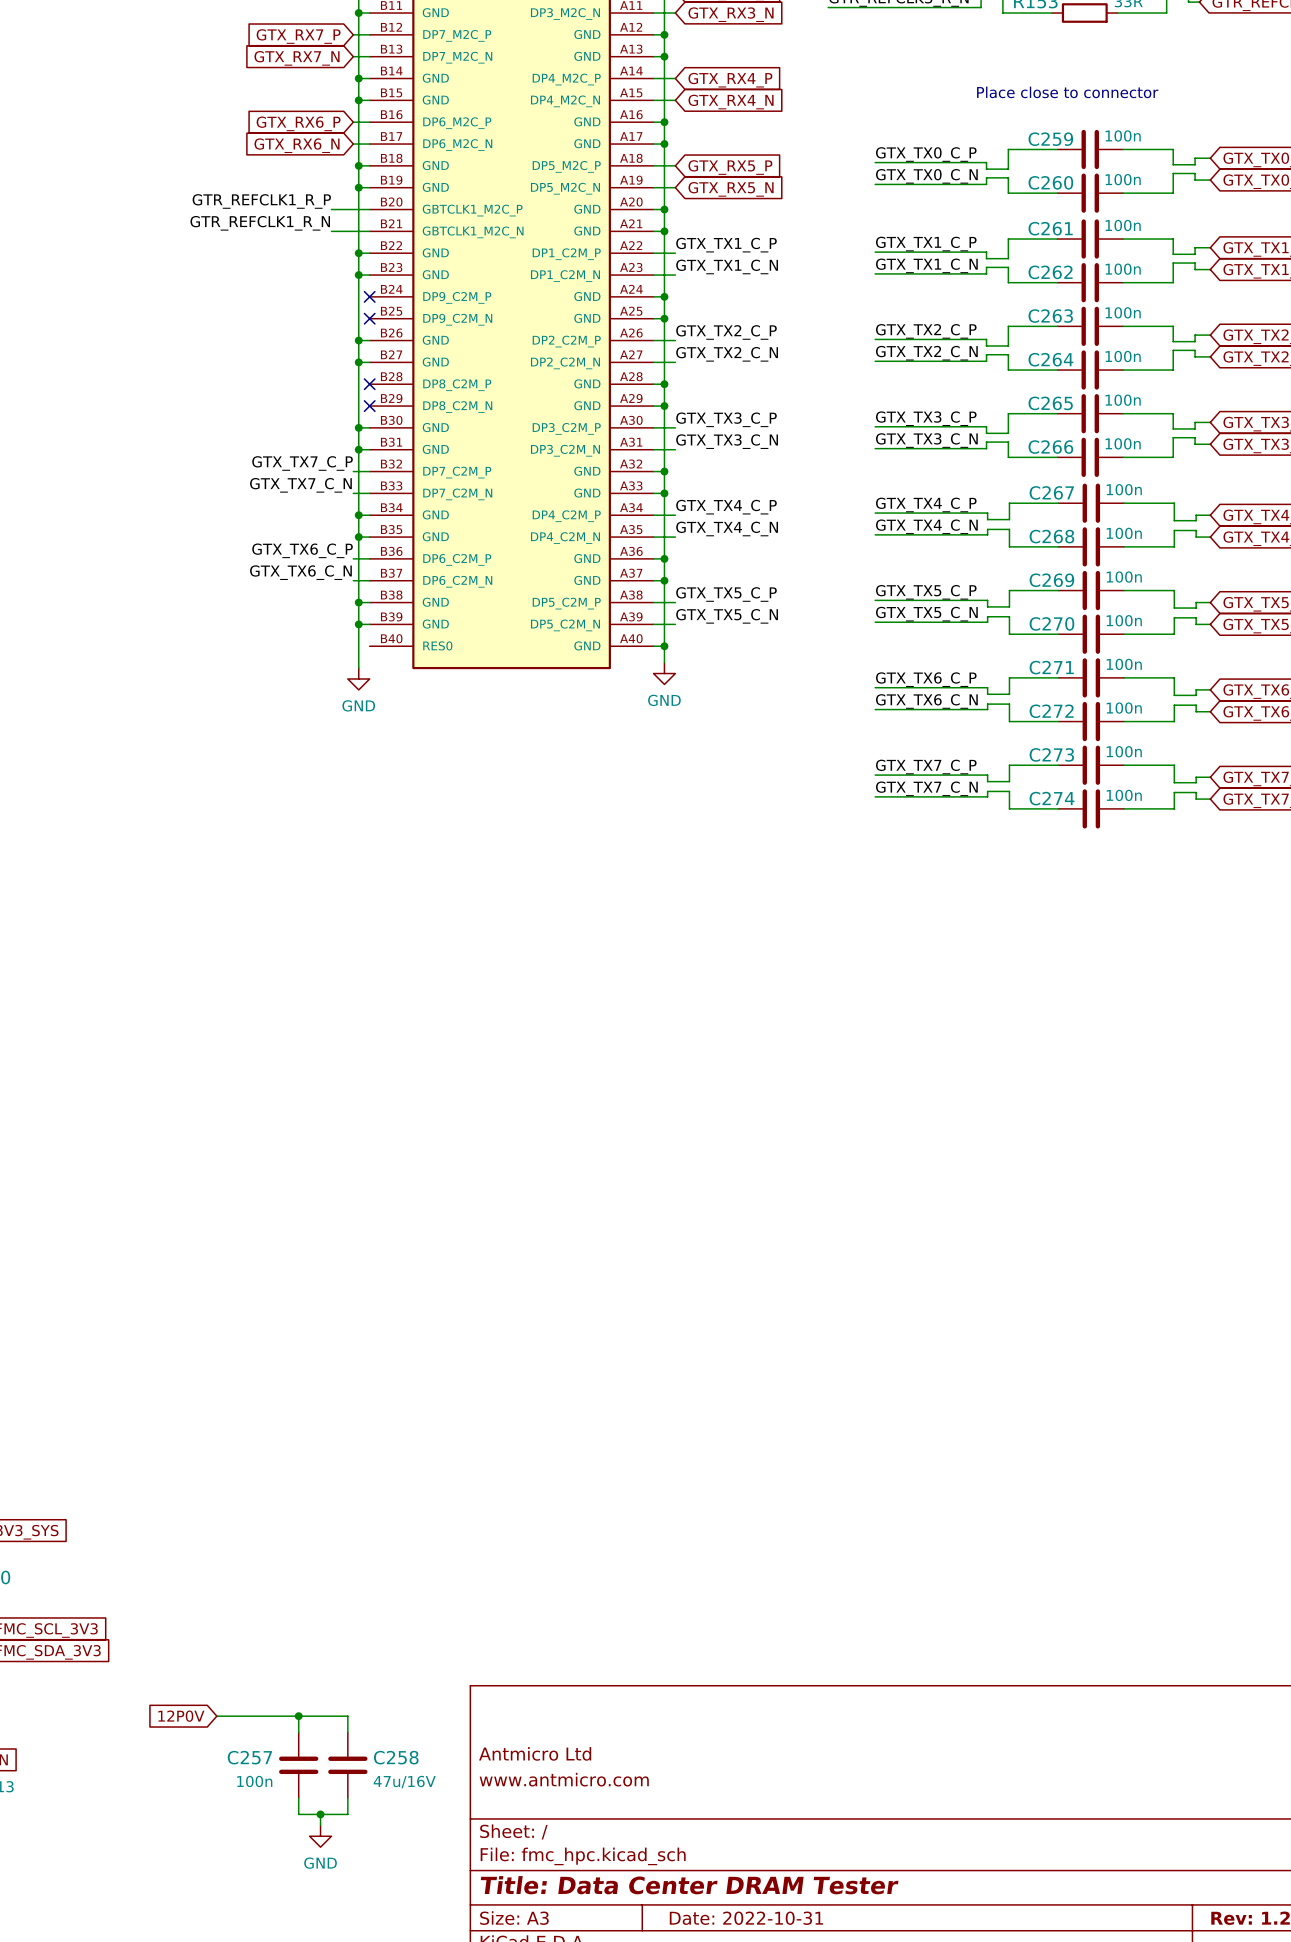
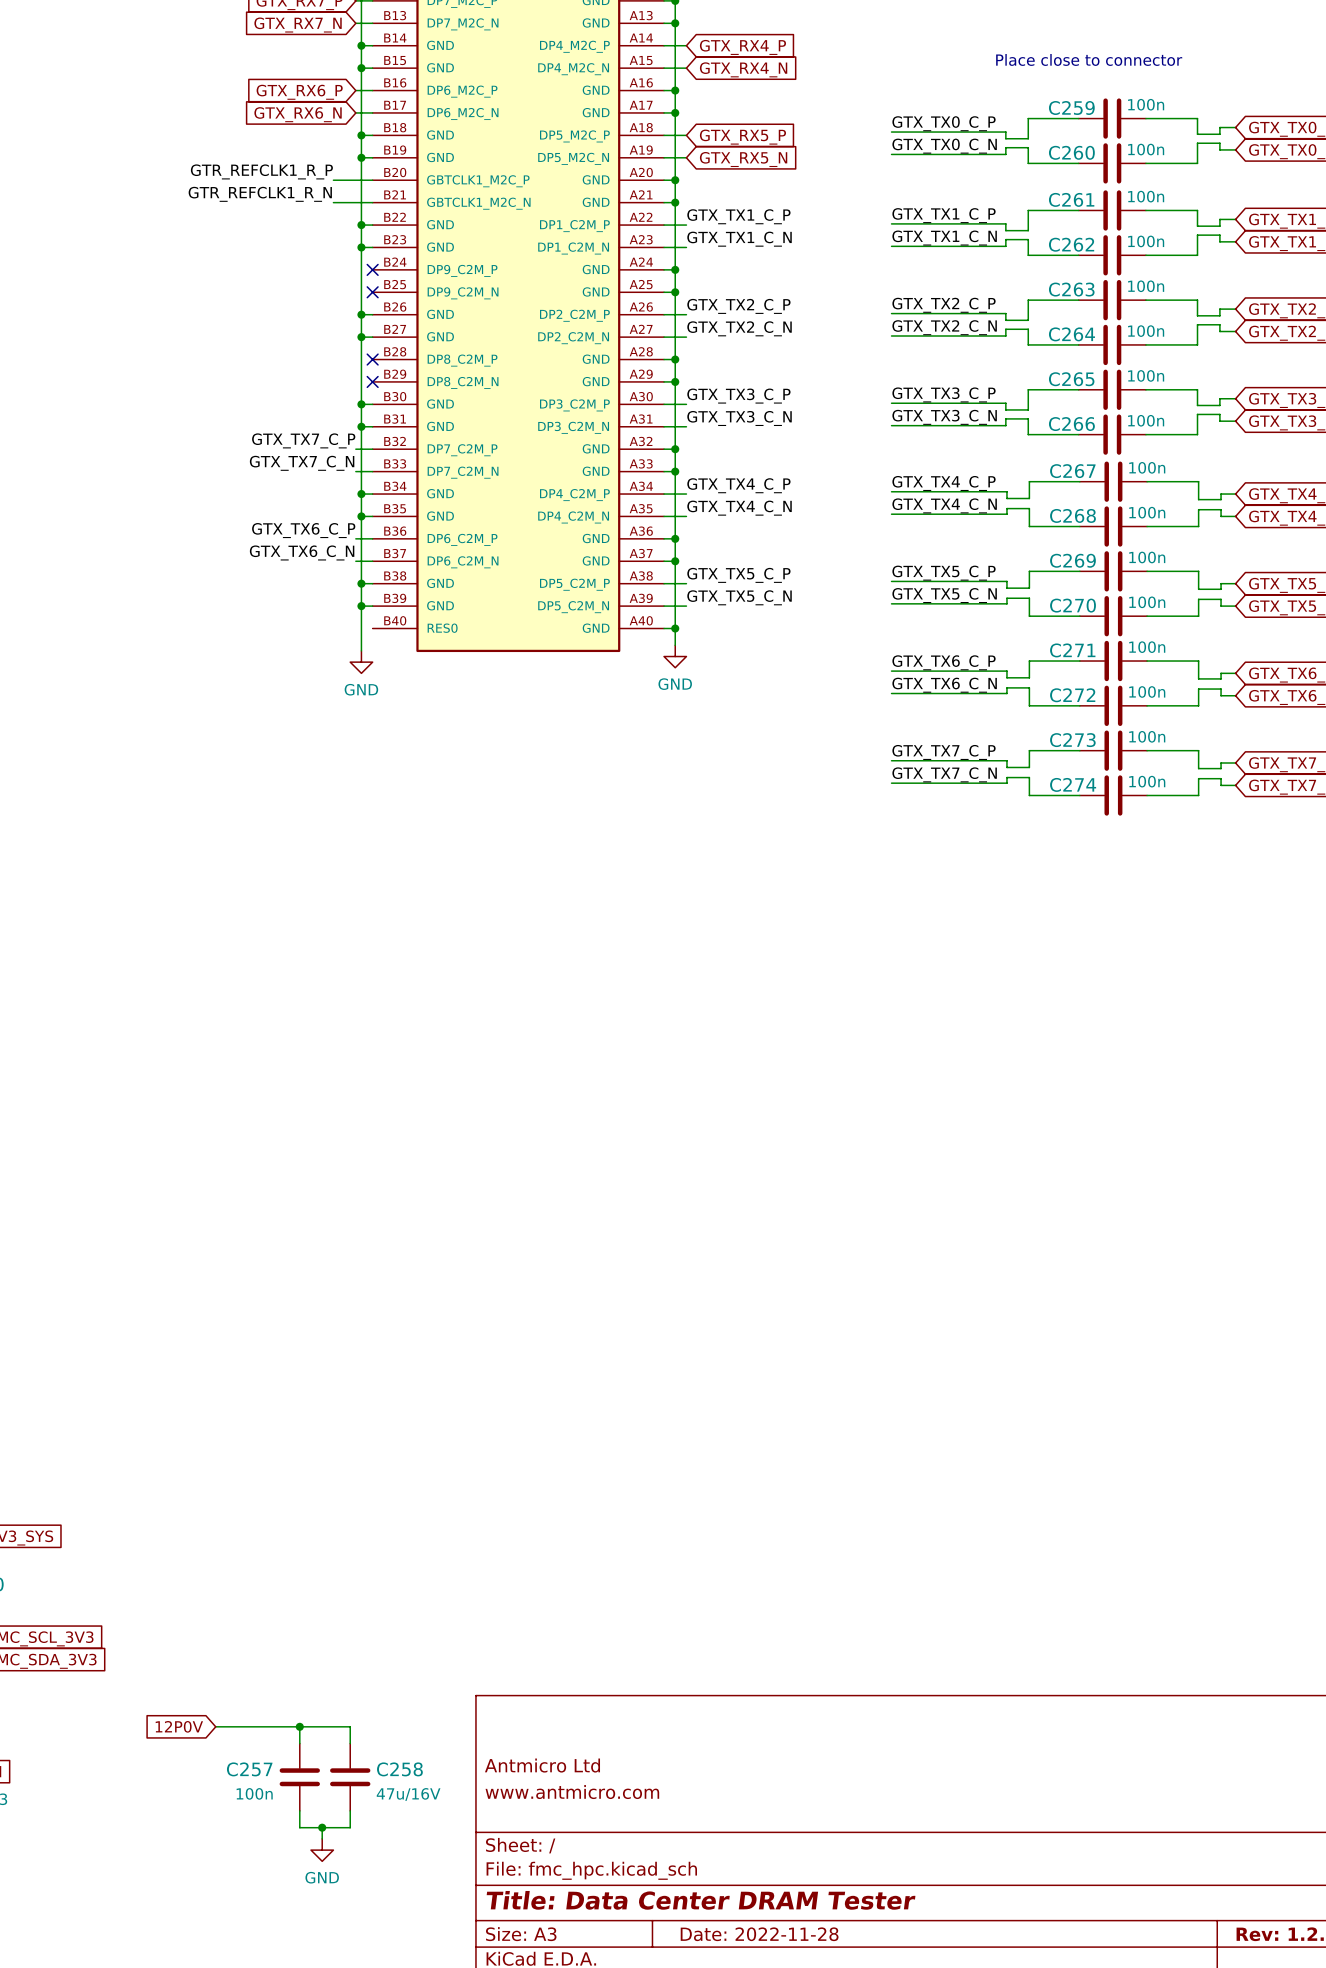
title block: Date: 2022-10-31 (746, 1918) -> Date: 2022-11-28 (759, 1934)

